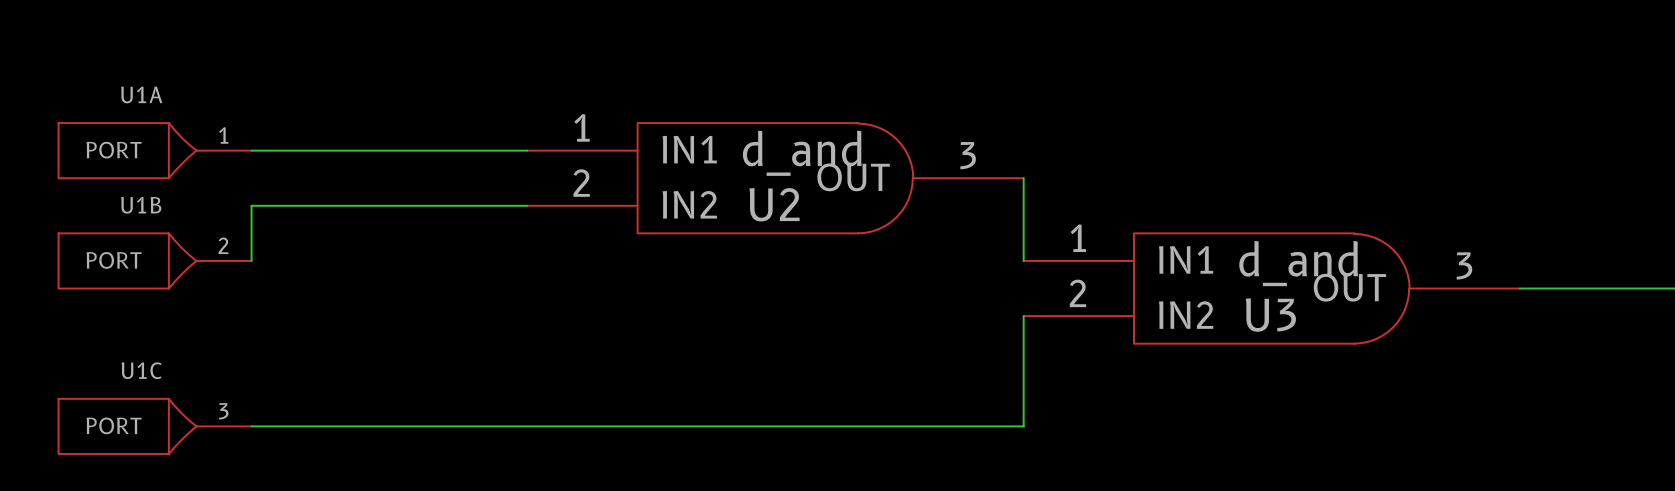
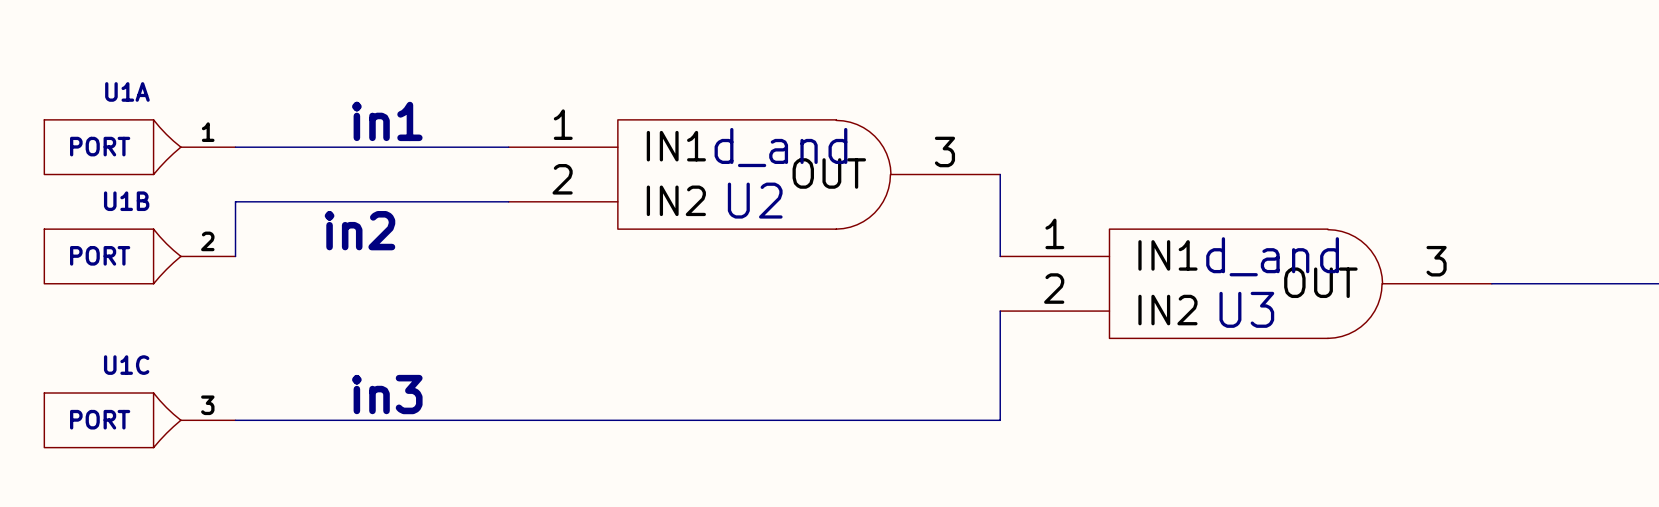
text: none -> in1 (387, 121)
text: none -> in2 (359, 230)
text: none -> in3 (387, 394)

